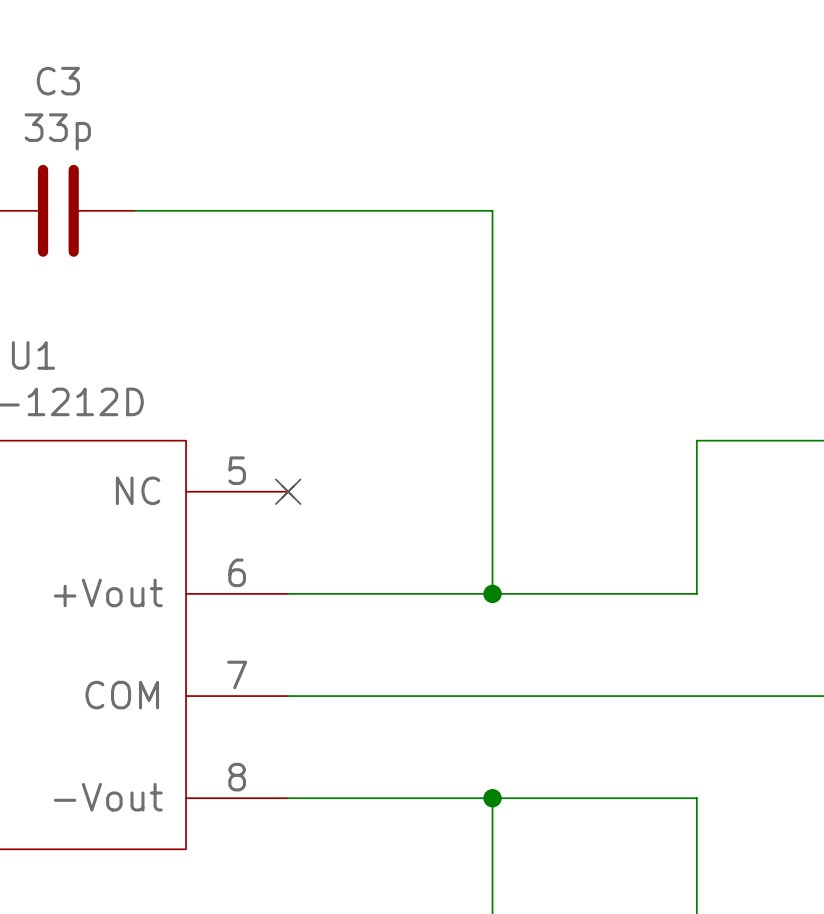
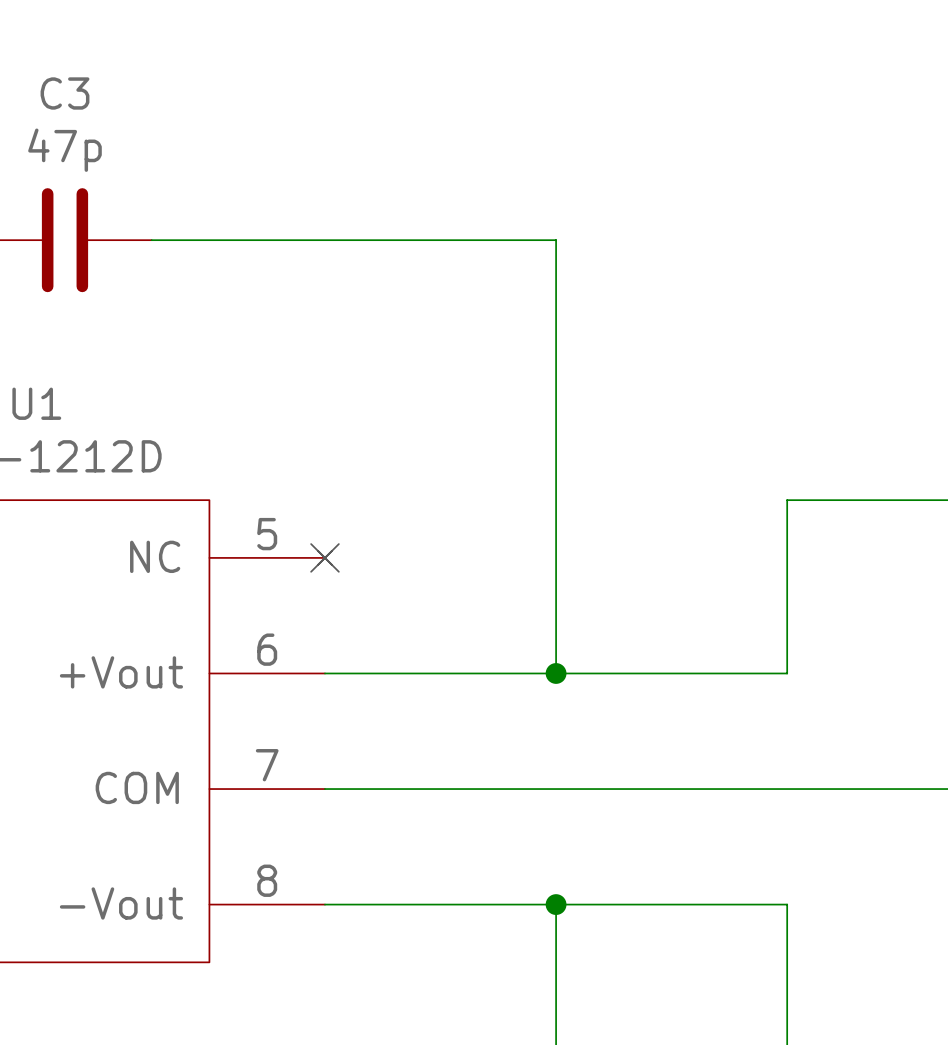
C3 value: 33p (57, 131) -> 47p (64, 150)

